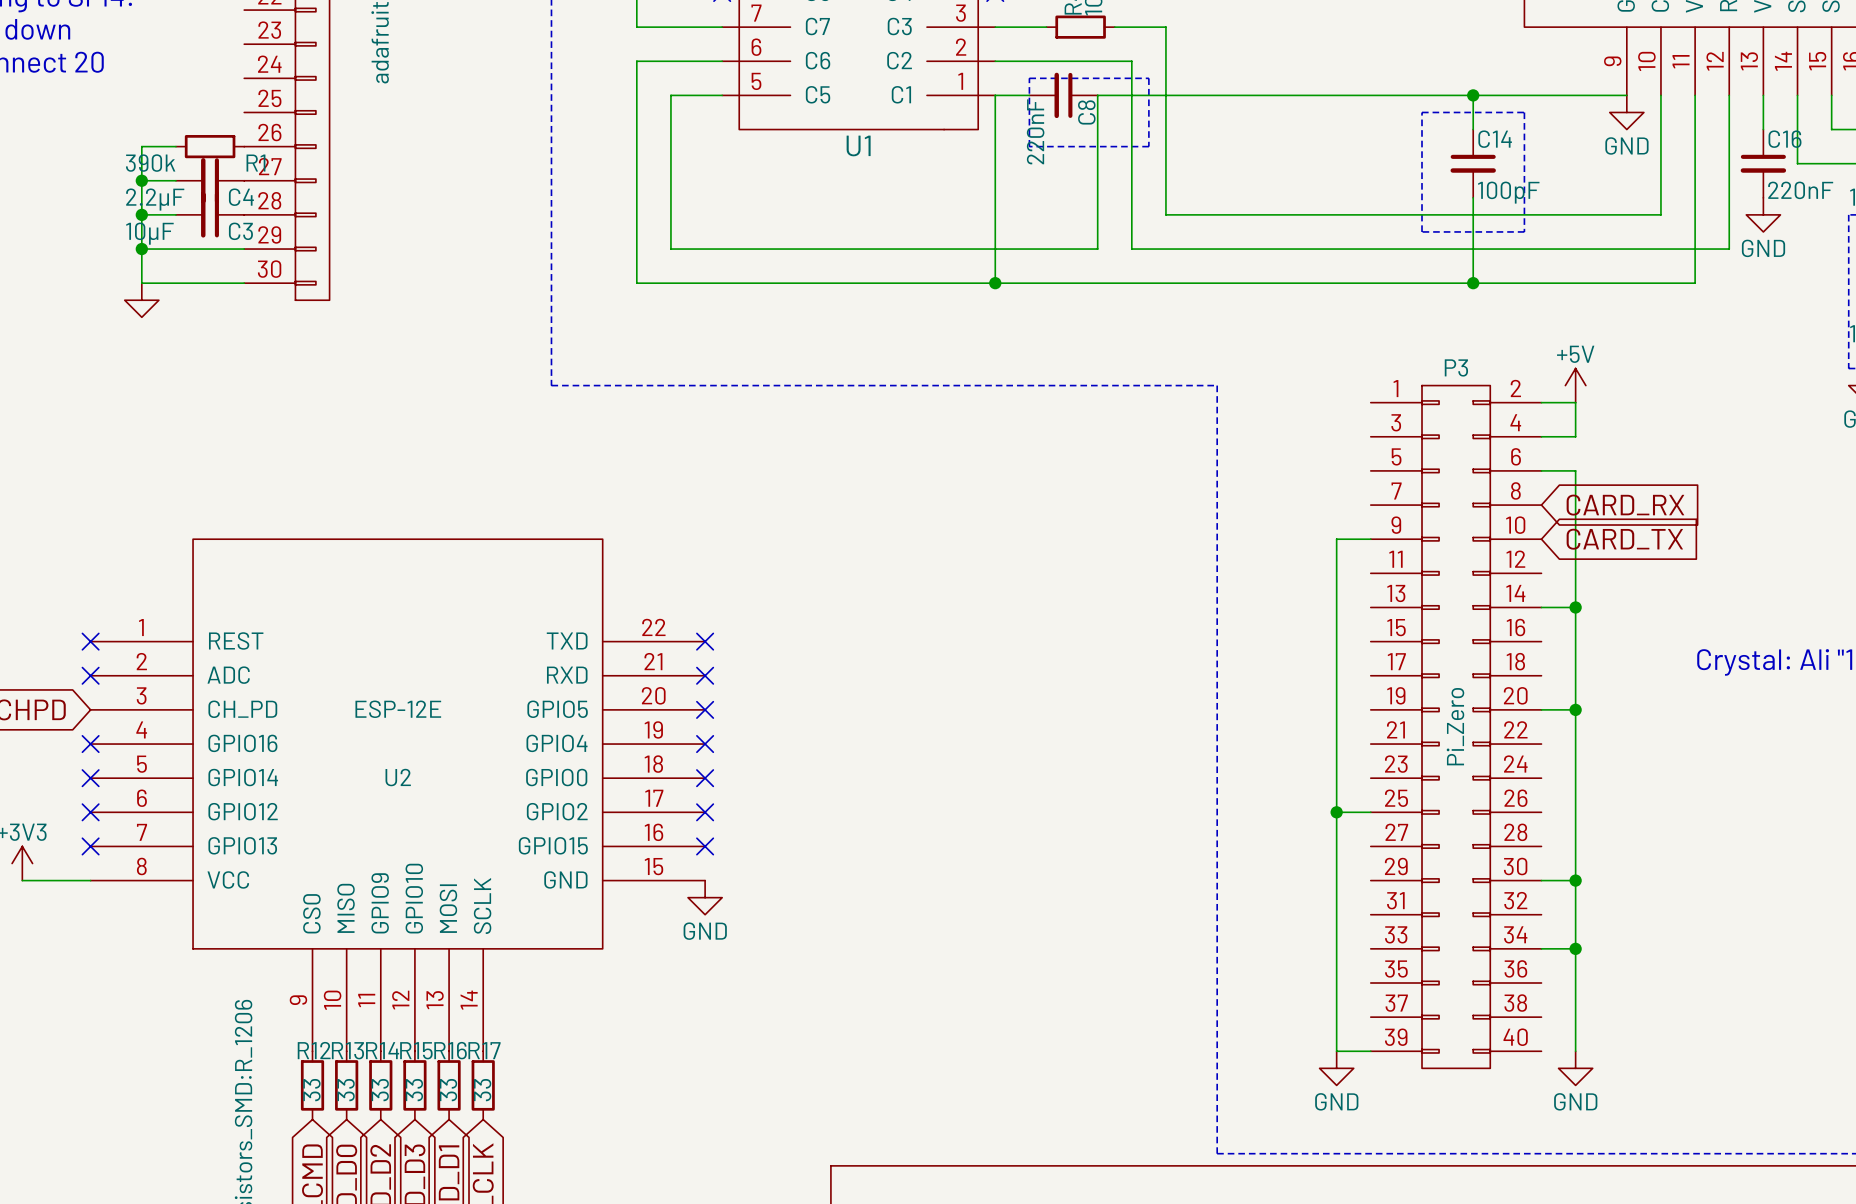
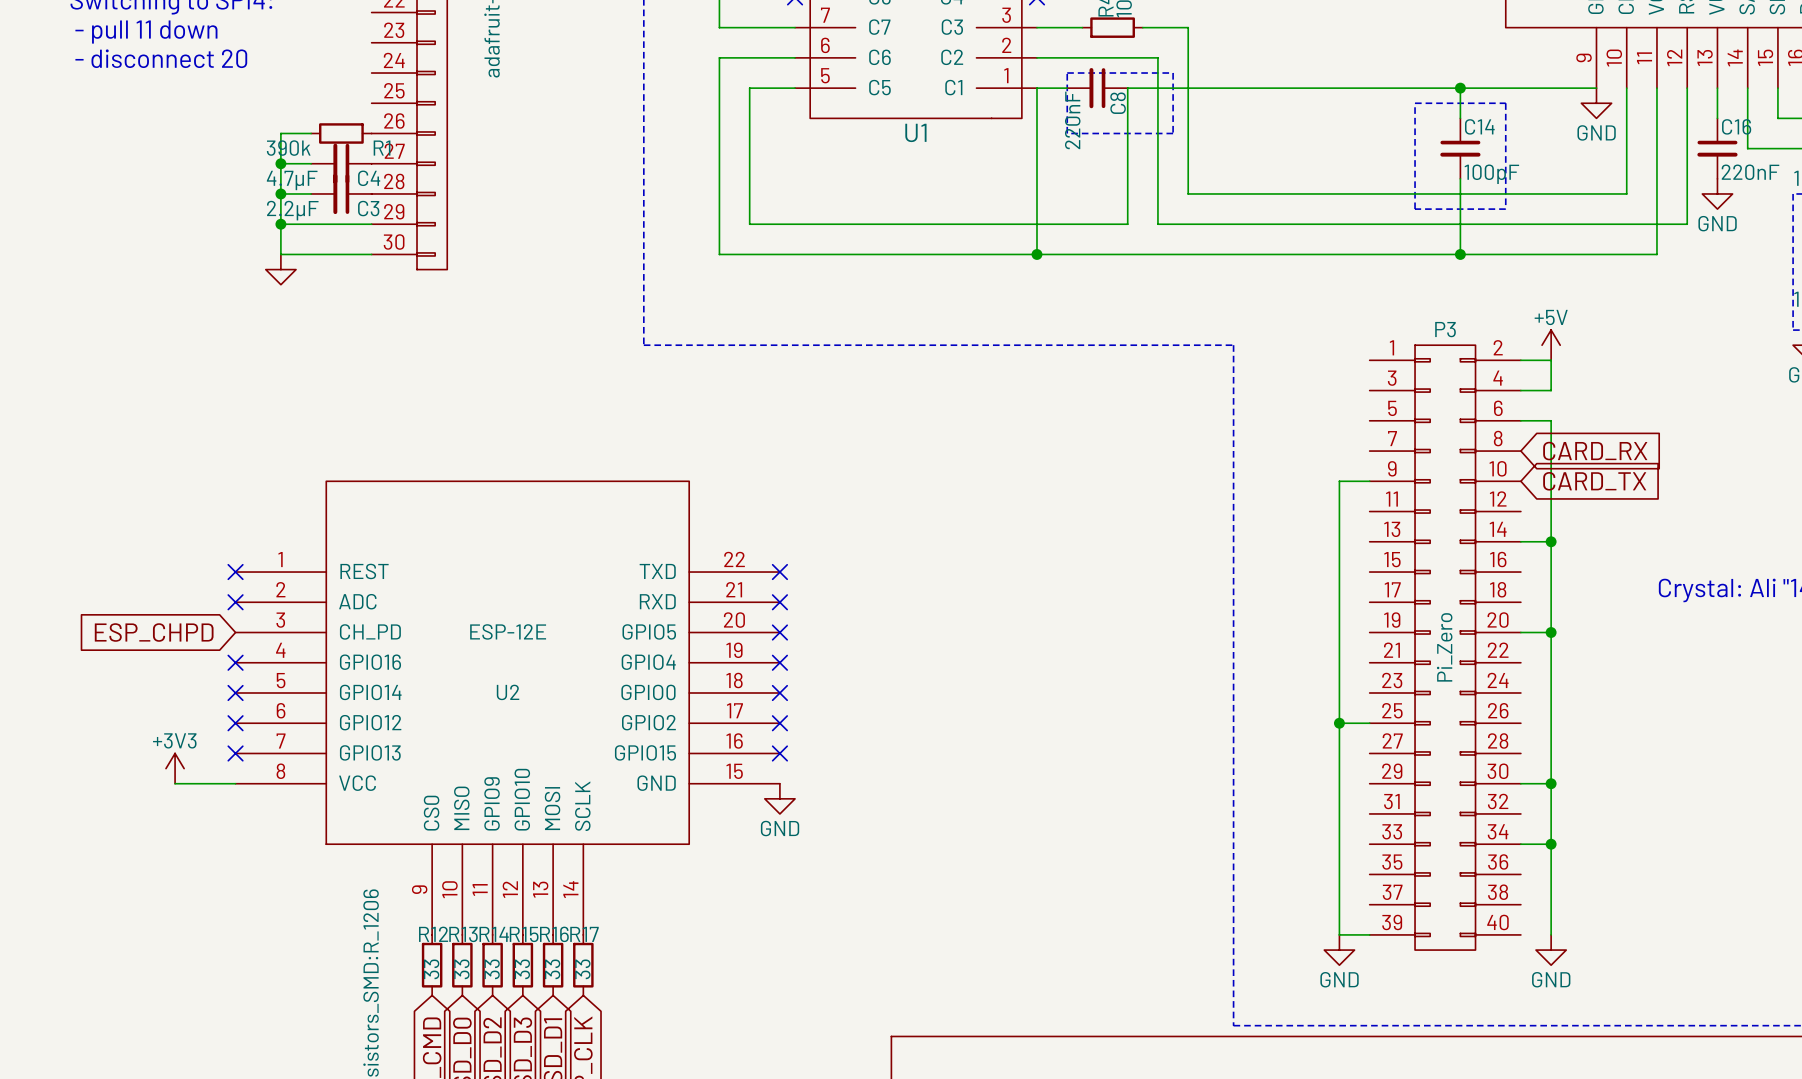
C4 value: 2.2µF (155, 199) -> 4.7µF (292, 180)
C3 value: 10µF (149, 233) -> 2.2µF (292, 210)

